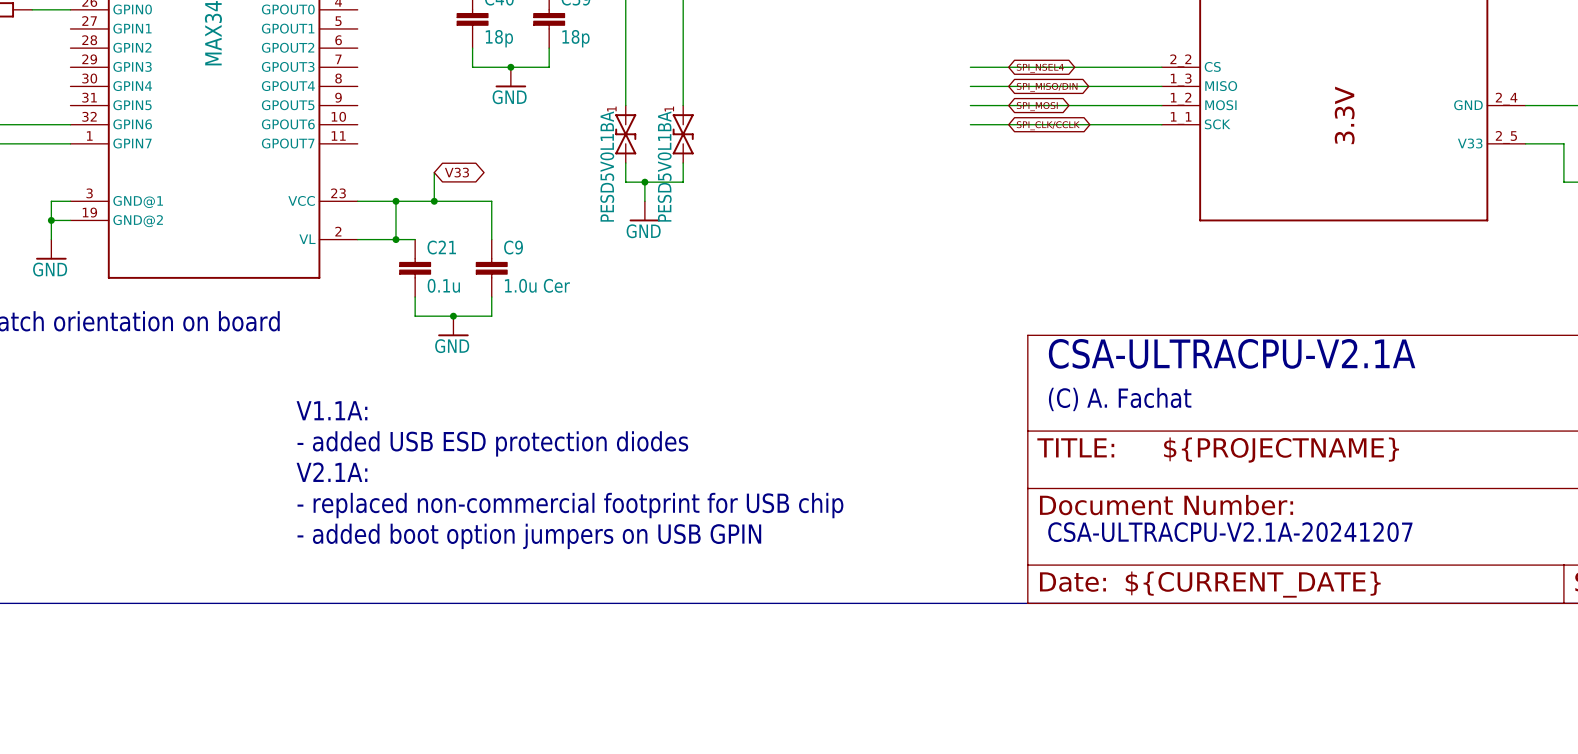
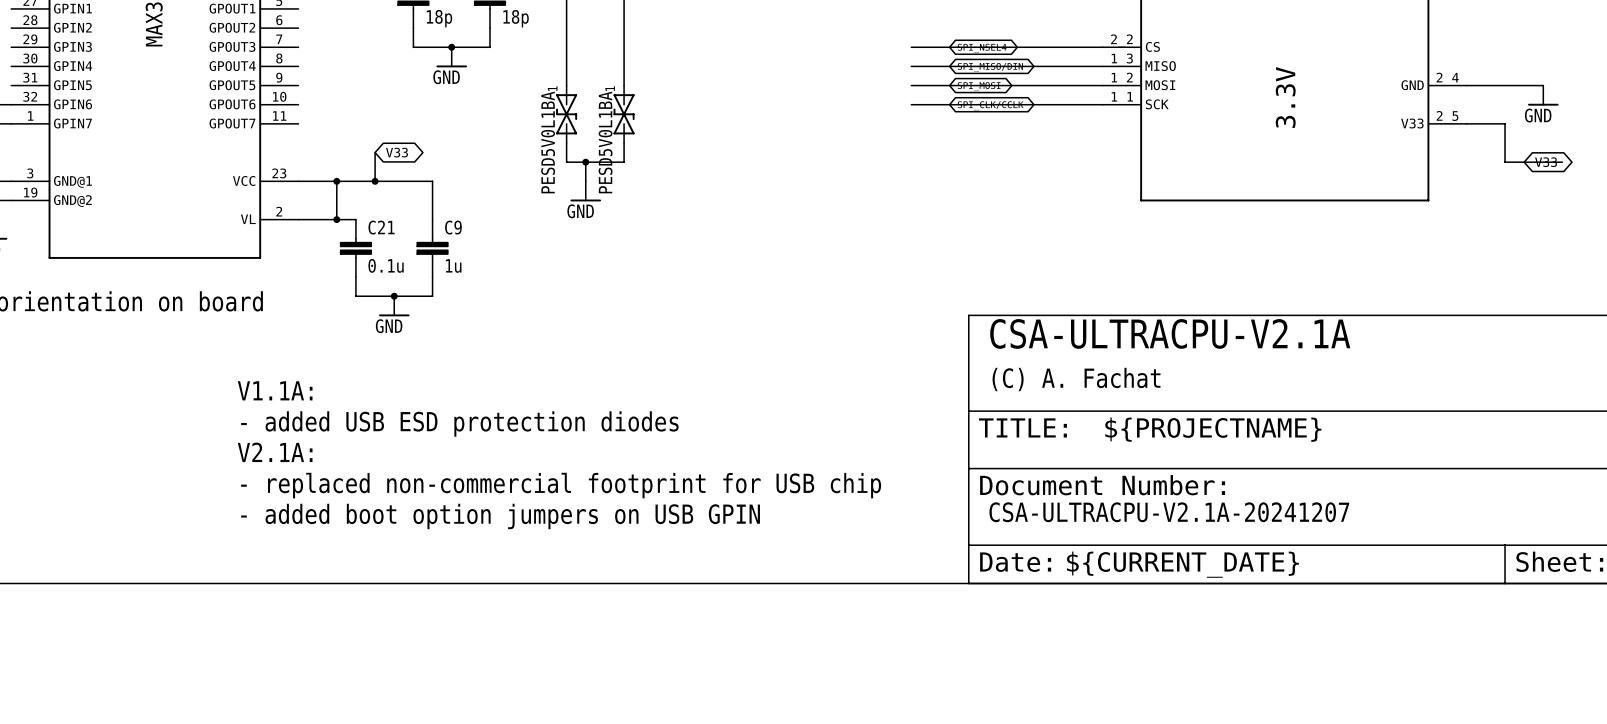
C9 value: 1.0u Cer (537, 285) -> 1u (453, 265)

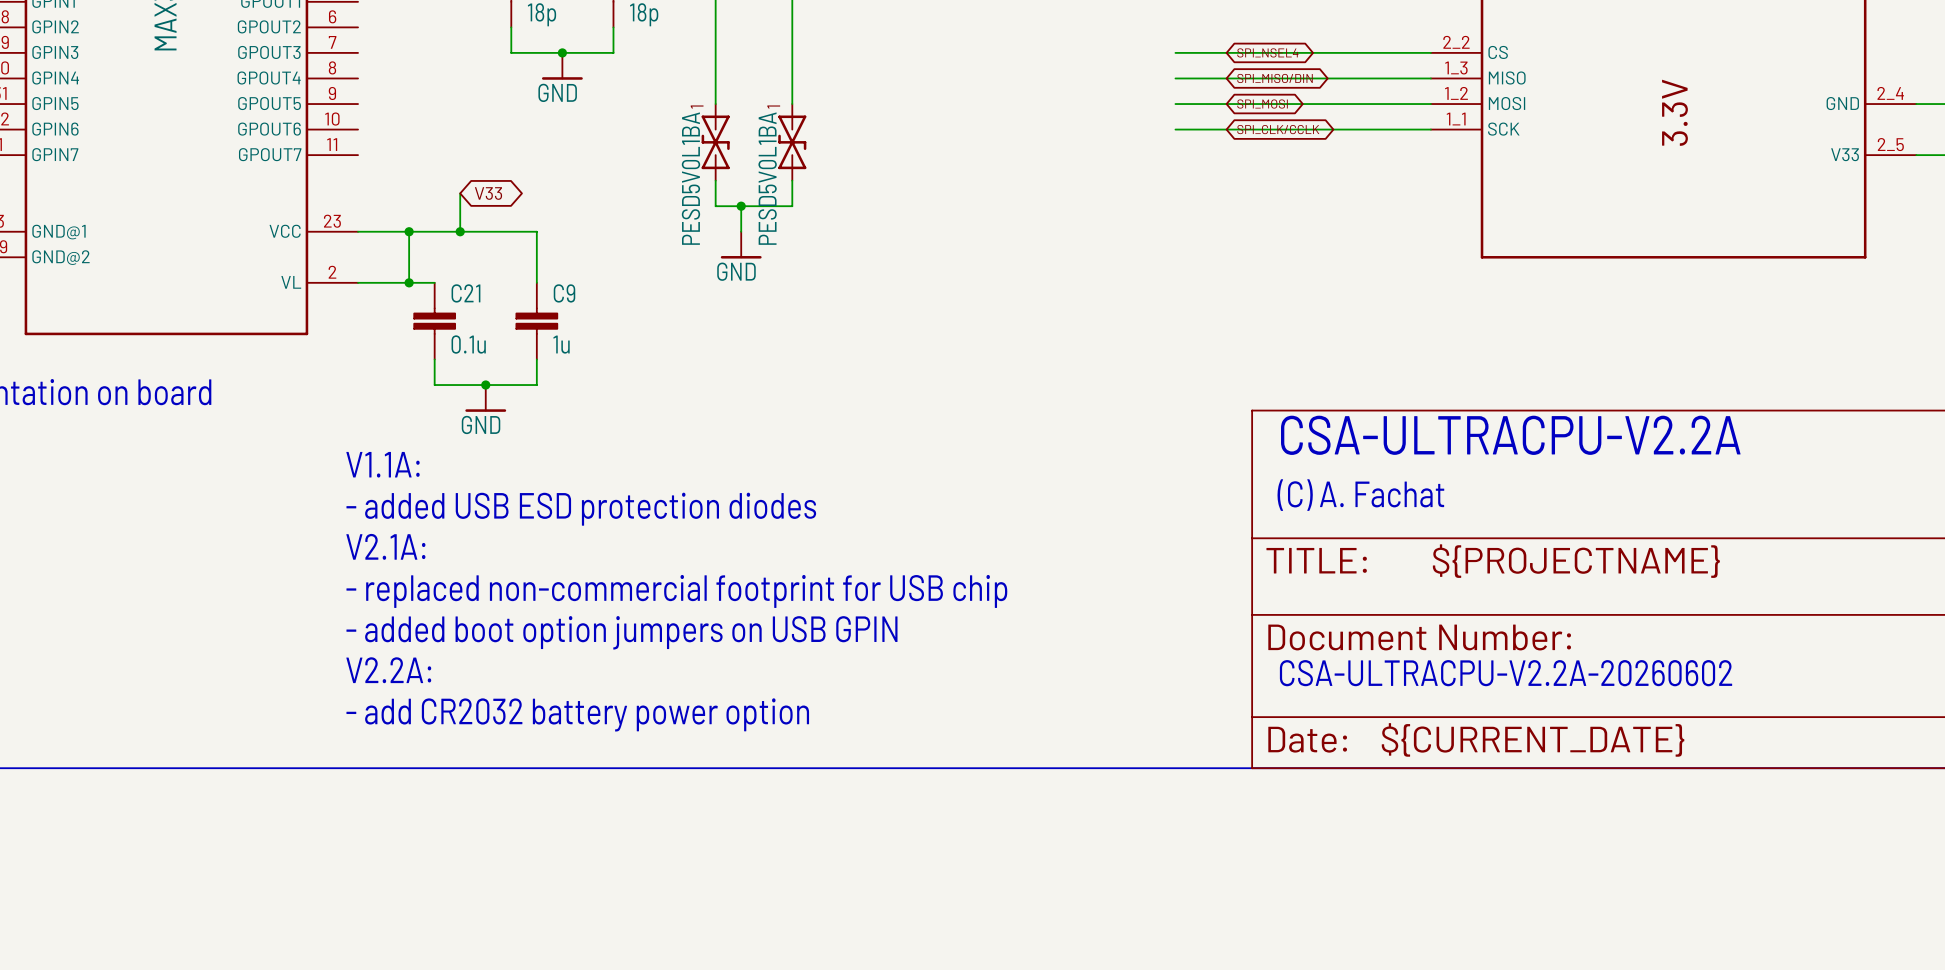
text: CSA-ULTRACPU-V2.1A (1170, 333) -> CSA-ULTRACPU-V2.2A (1510, 435)
text position: V1.1A: (275, 390) -> V1.1A: (383, 464)
text position: - added USB ESD protection diodes (459, 423) -> - added USB ESD protection diodes (581, 509)
text position: V2.1A: (275, 452) -> V2.1A: (385, 546)
text position: - replaced non-commercial footprint for USB chip (561, 485) -> - replaced non-commercial footprint for USB chip (676, 591)
text: none -> V2.2A: (388, 670)
text: CSA-ULTRACPU-V2.1A-20241207 (1169, 512) -> CSA-ULTRACPU-V2.2A-20260602 (1506, 673)
text position: - added boot option jumpers on USB GPIN (500, 516) -> - added boot option jumpers on USB GPIN (621, 632)
text: none -> - add CR2032 battery power option (577, 714)

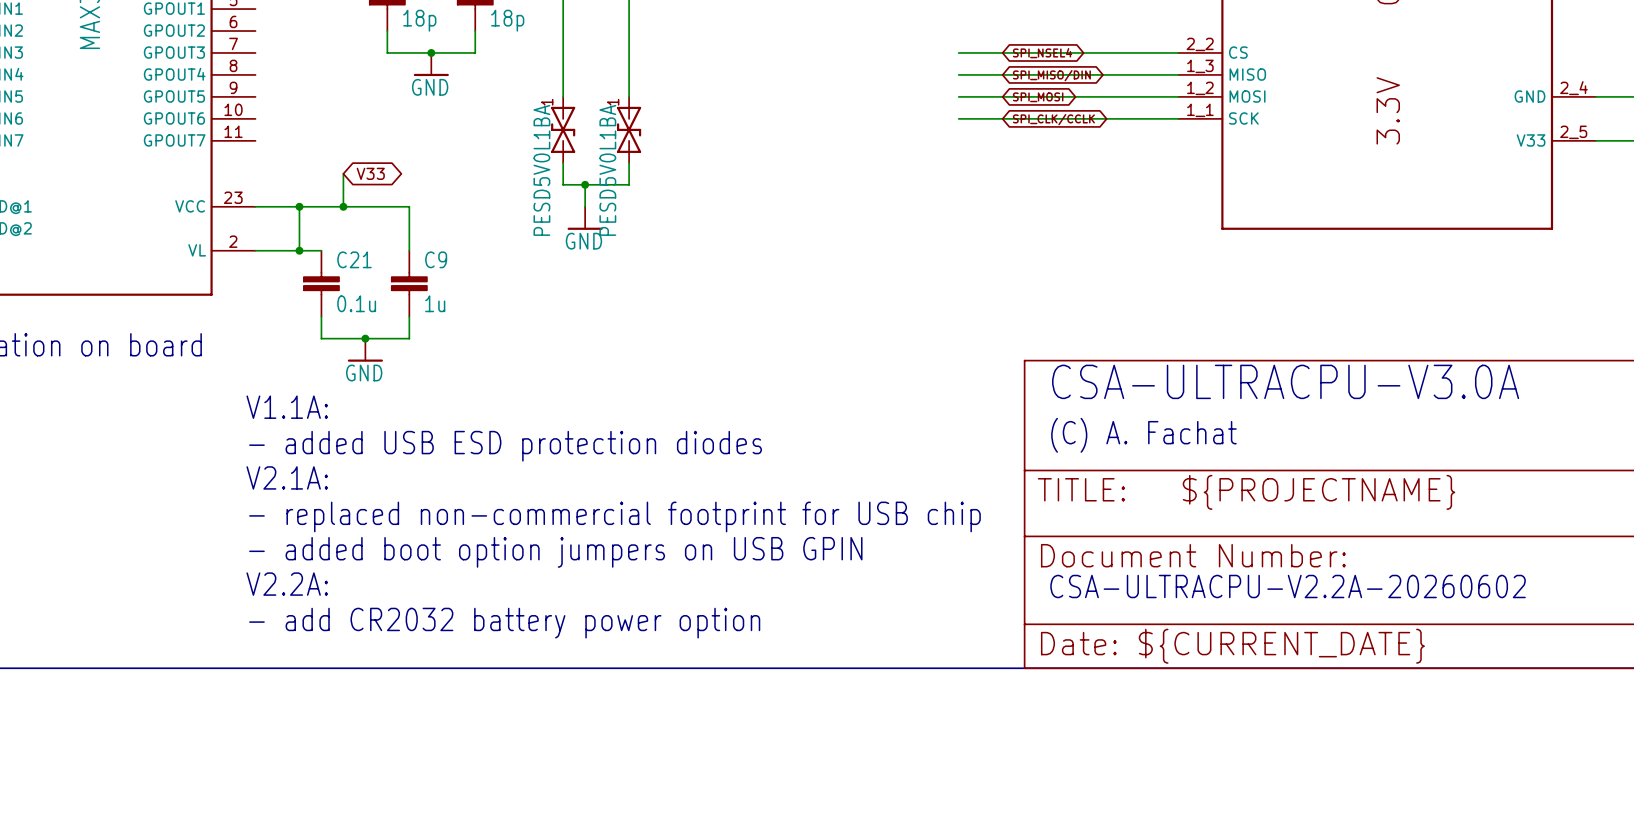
text: CSA-ULTRACPU-V2.2A (1510, 435) -> CSA-ULTRACPU-V3.0A (1285, 381)

